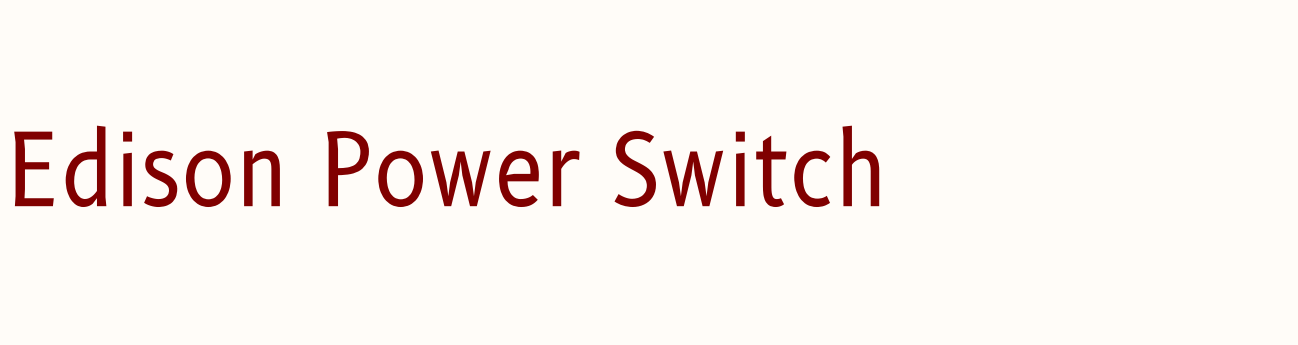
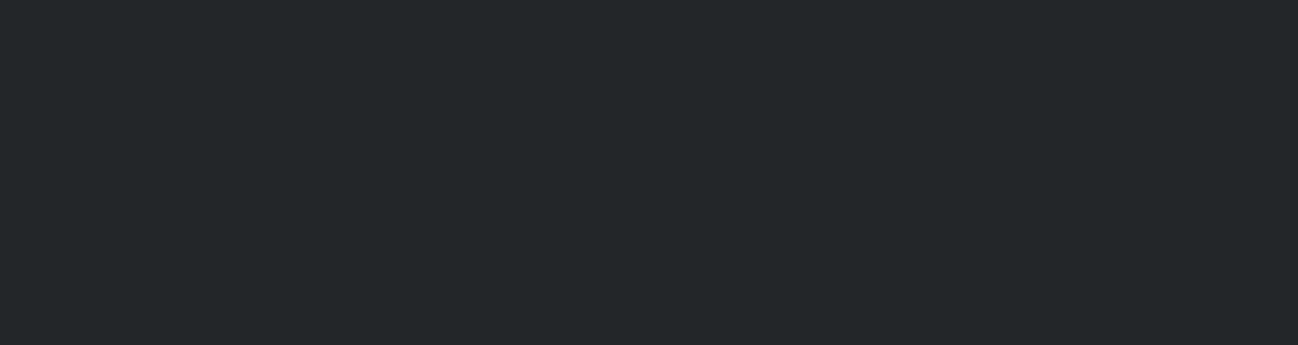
text: Edison Power Switch (446, 166) -> none

